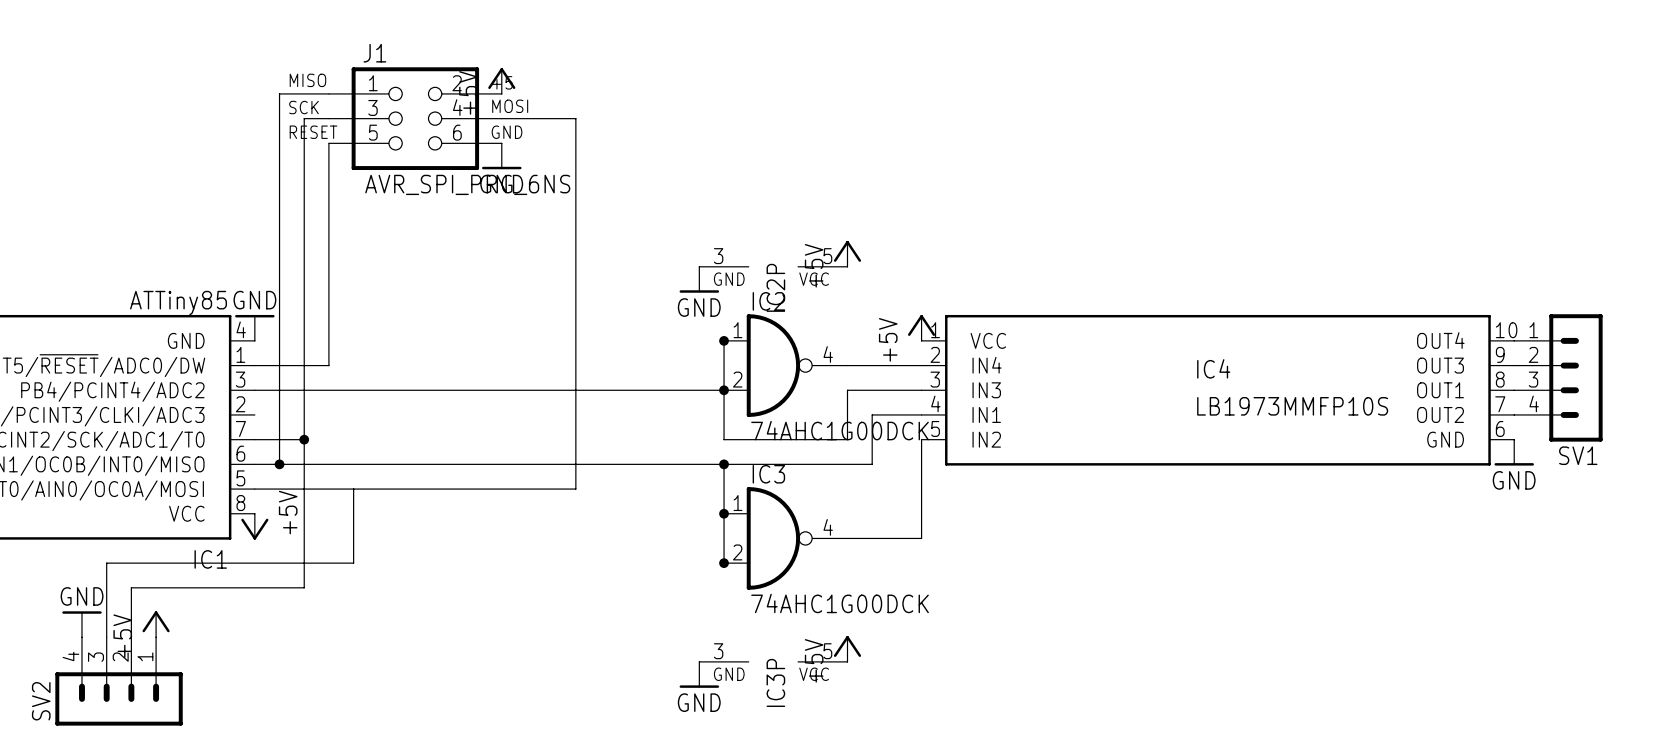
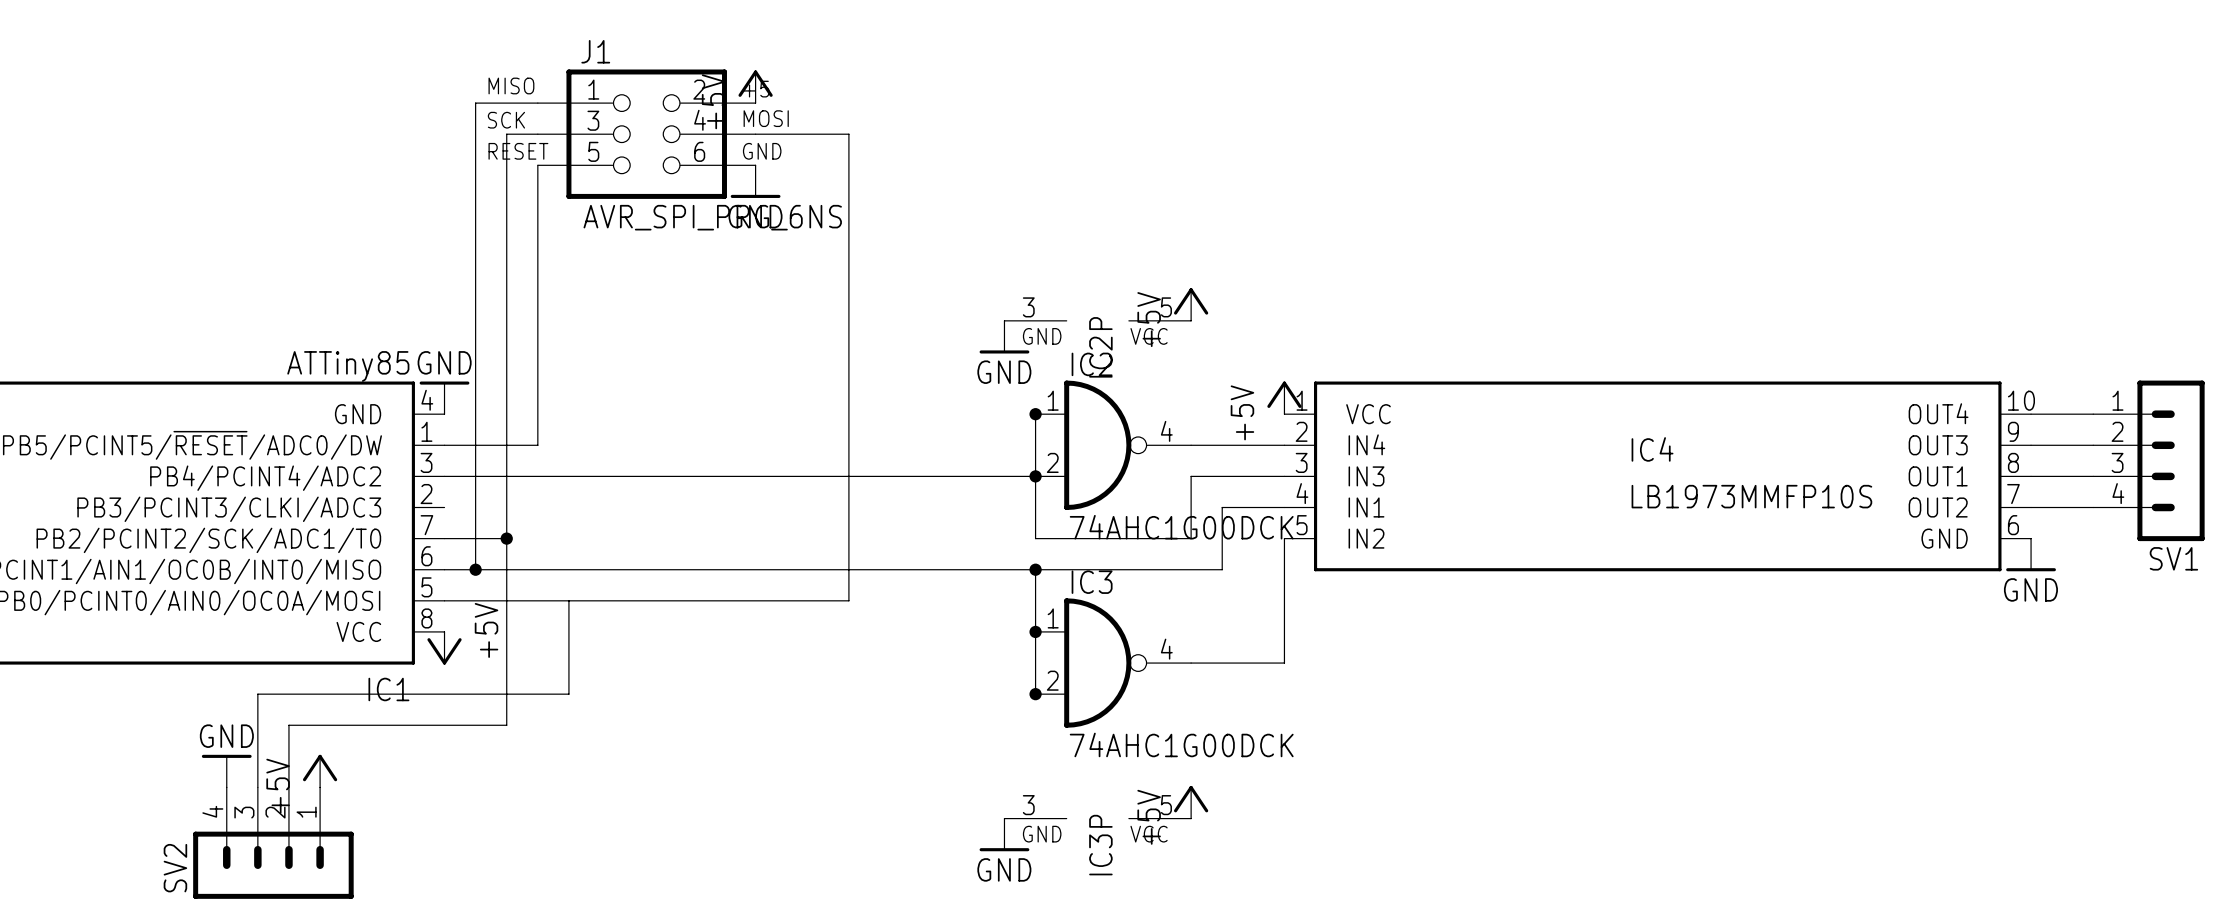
SV1 position: (1558, 377) -> (2148, 460)

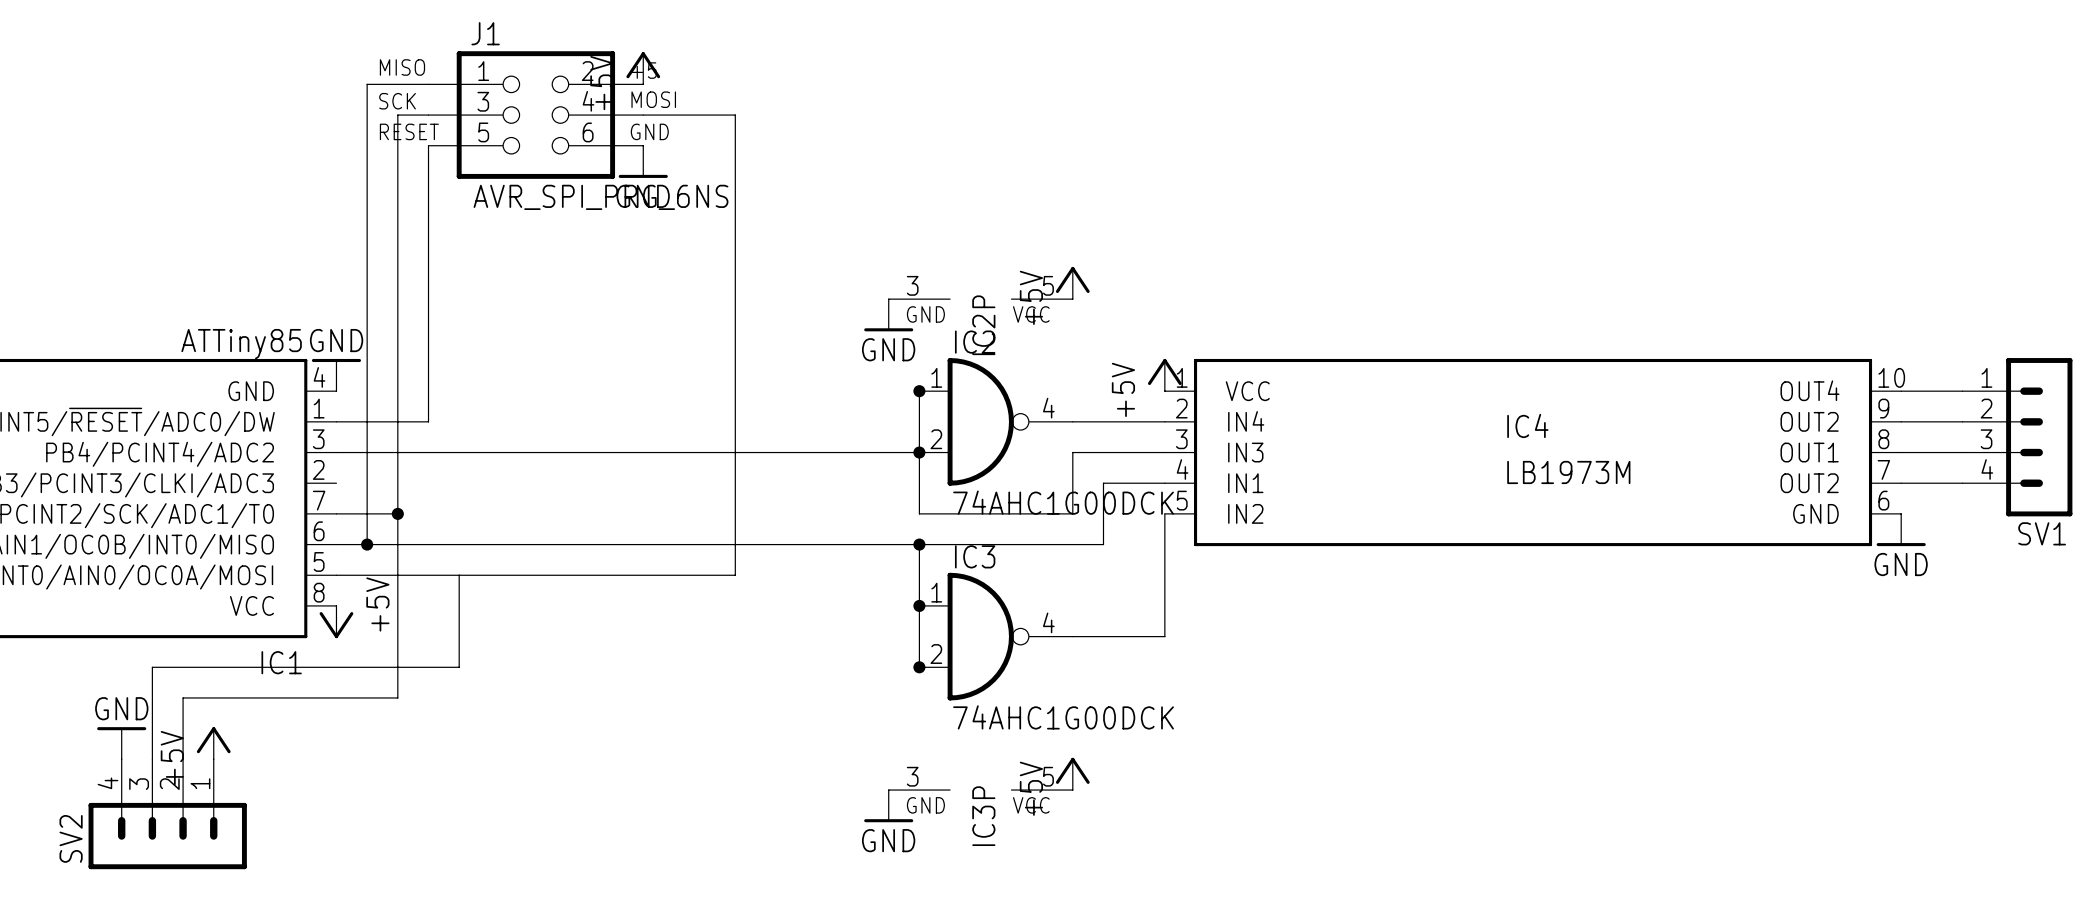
IC4 pin name: OUT3 (1938, 445) -> OUT2 (1809, 421)
IC4 value: LB1973MMFP10S (1751, 496) -> LB1973M (1568, 472)

